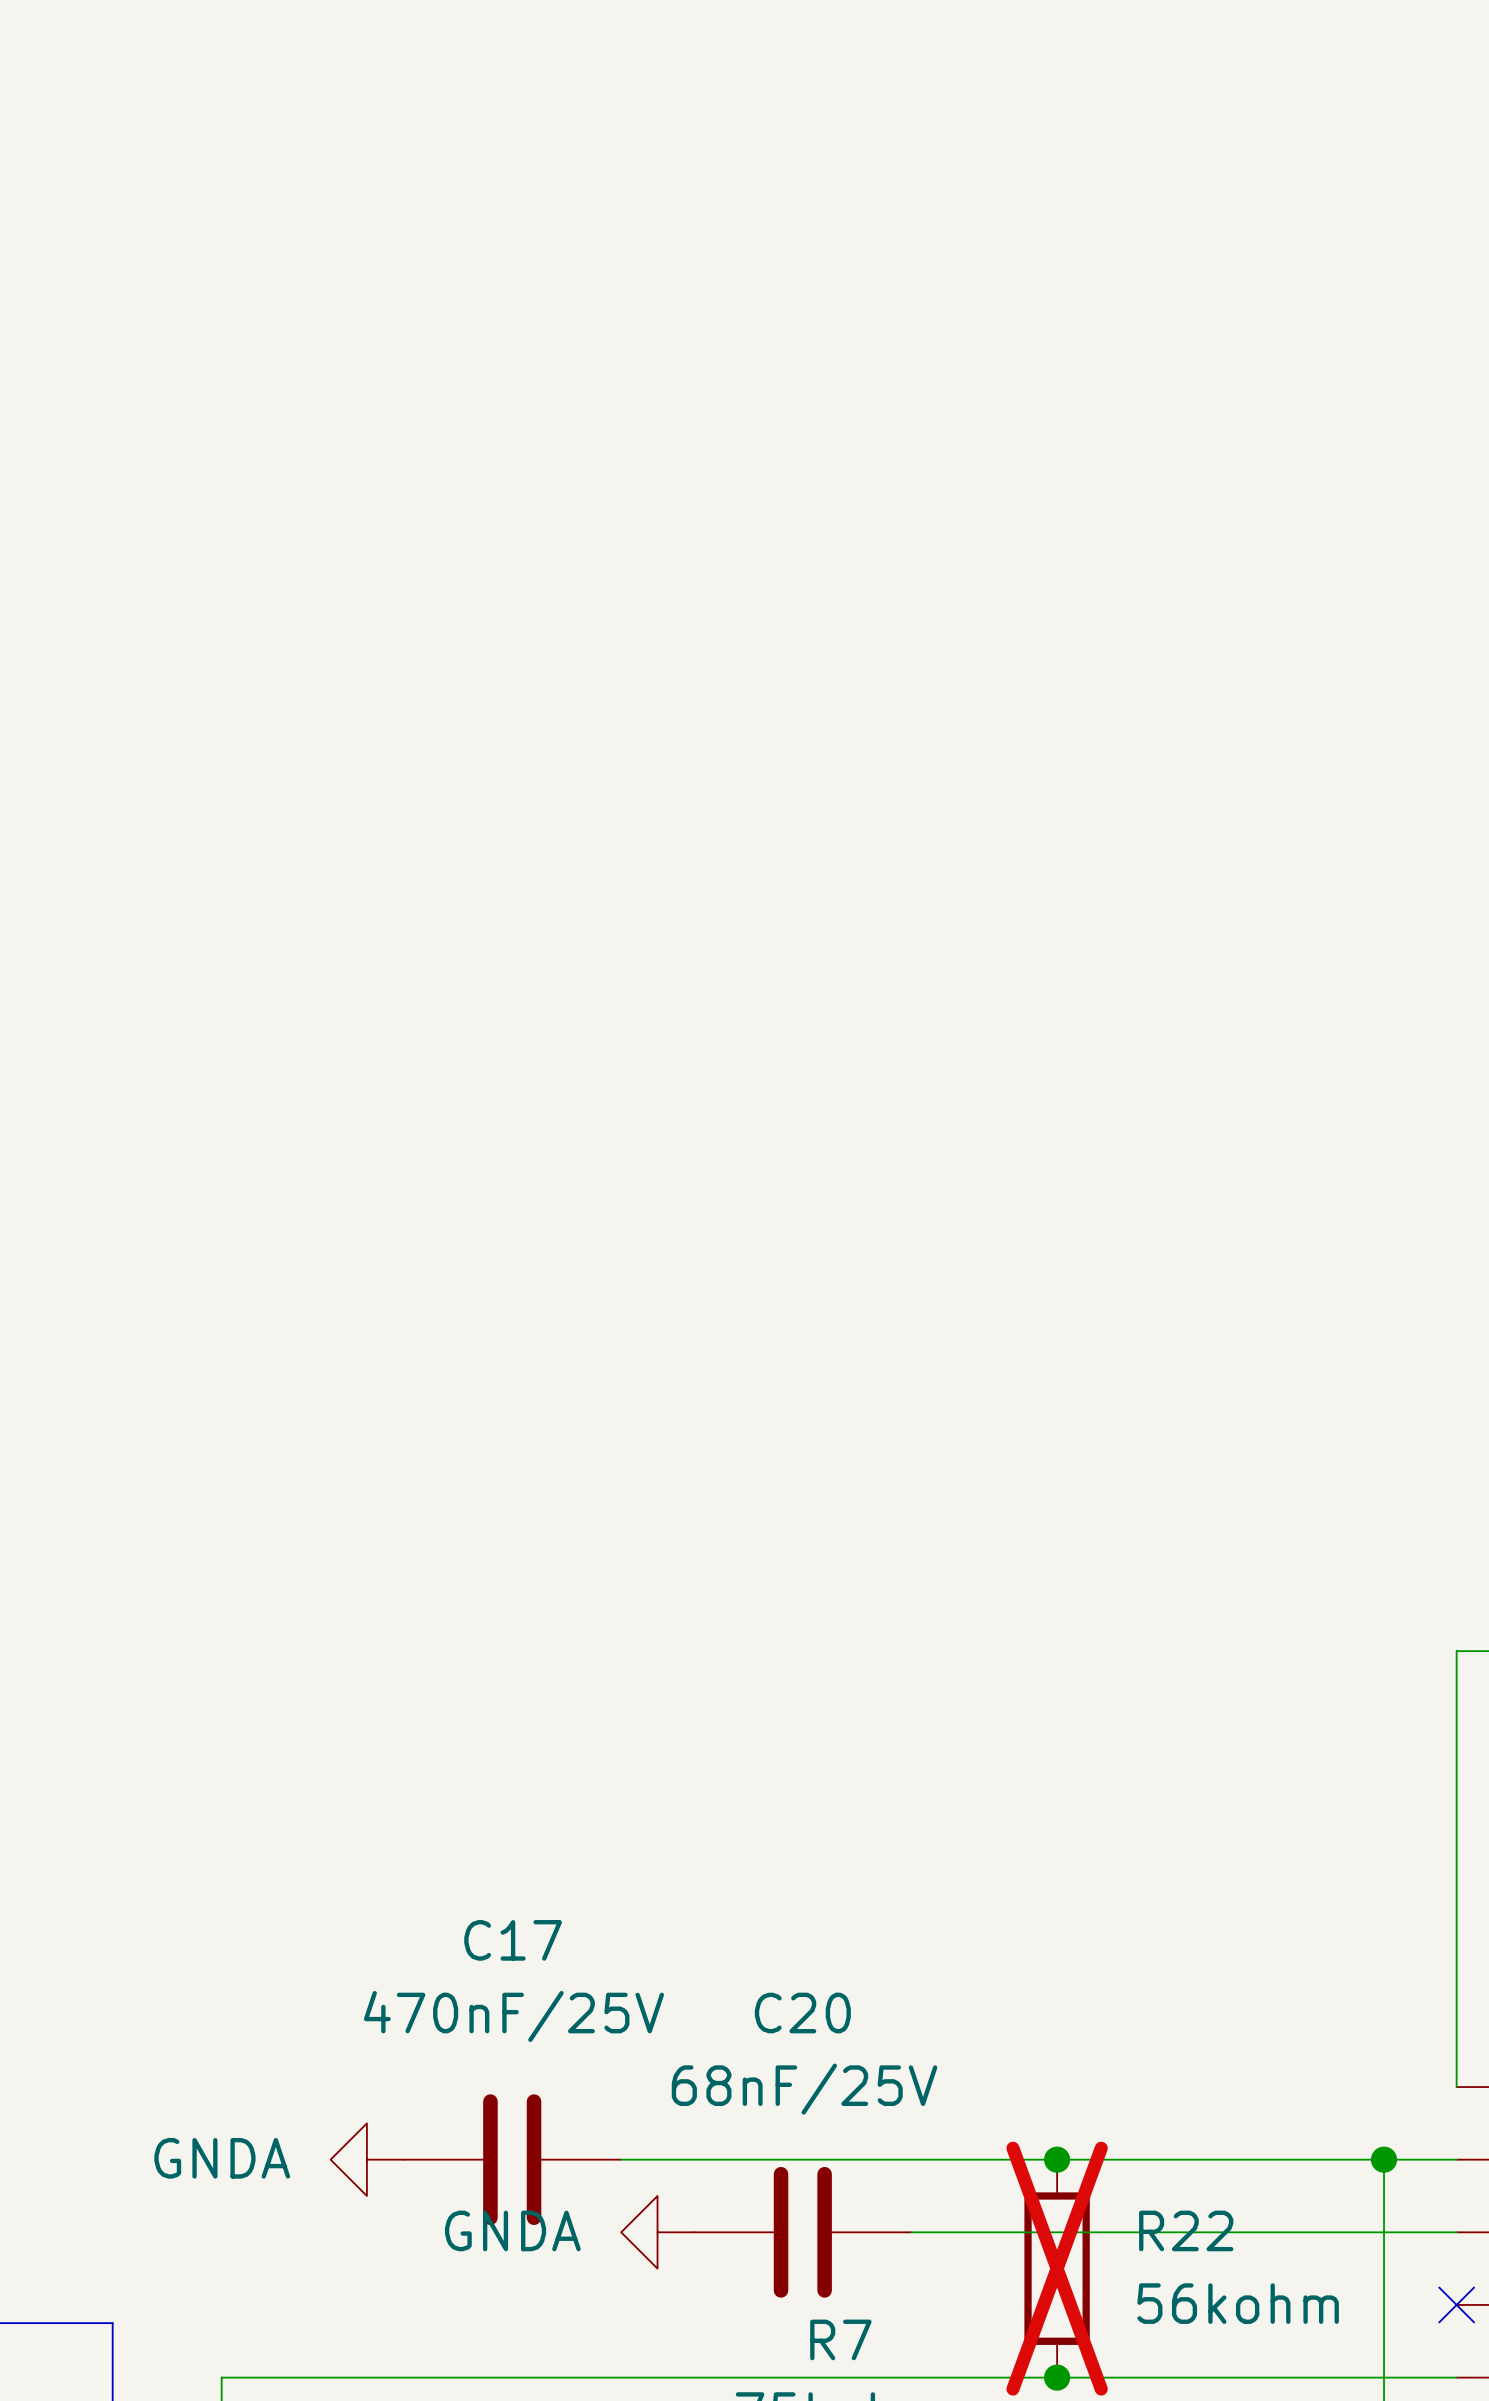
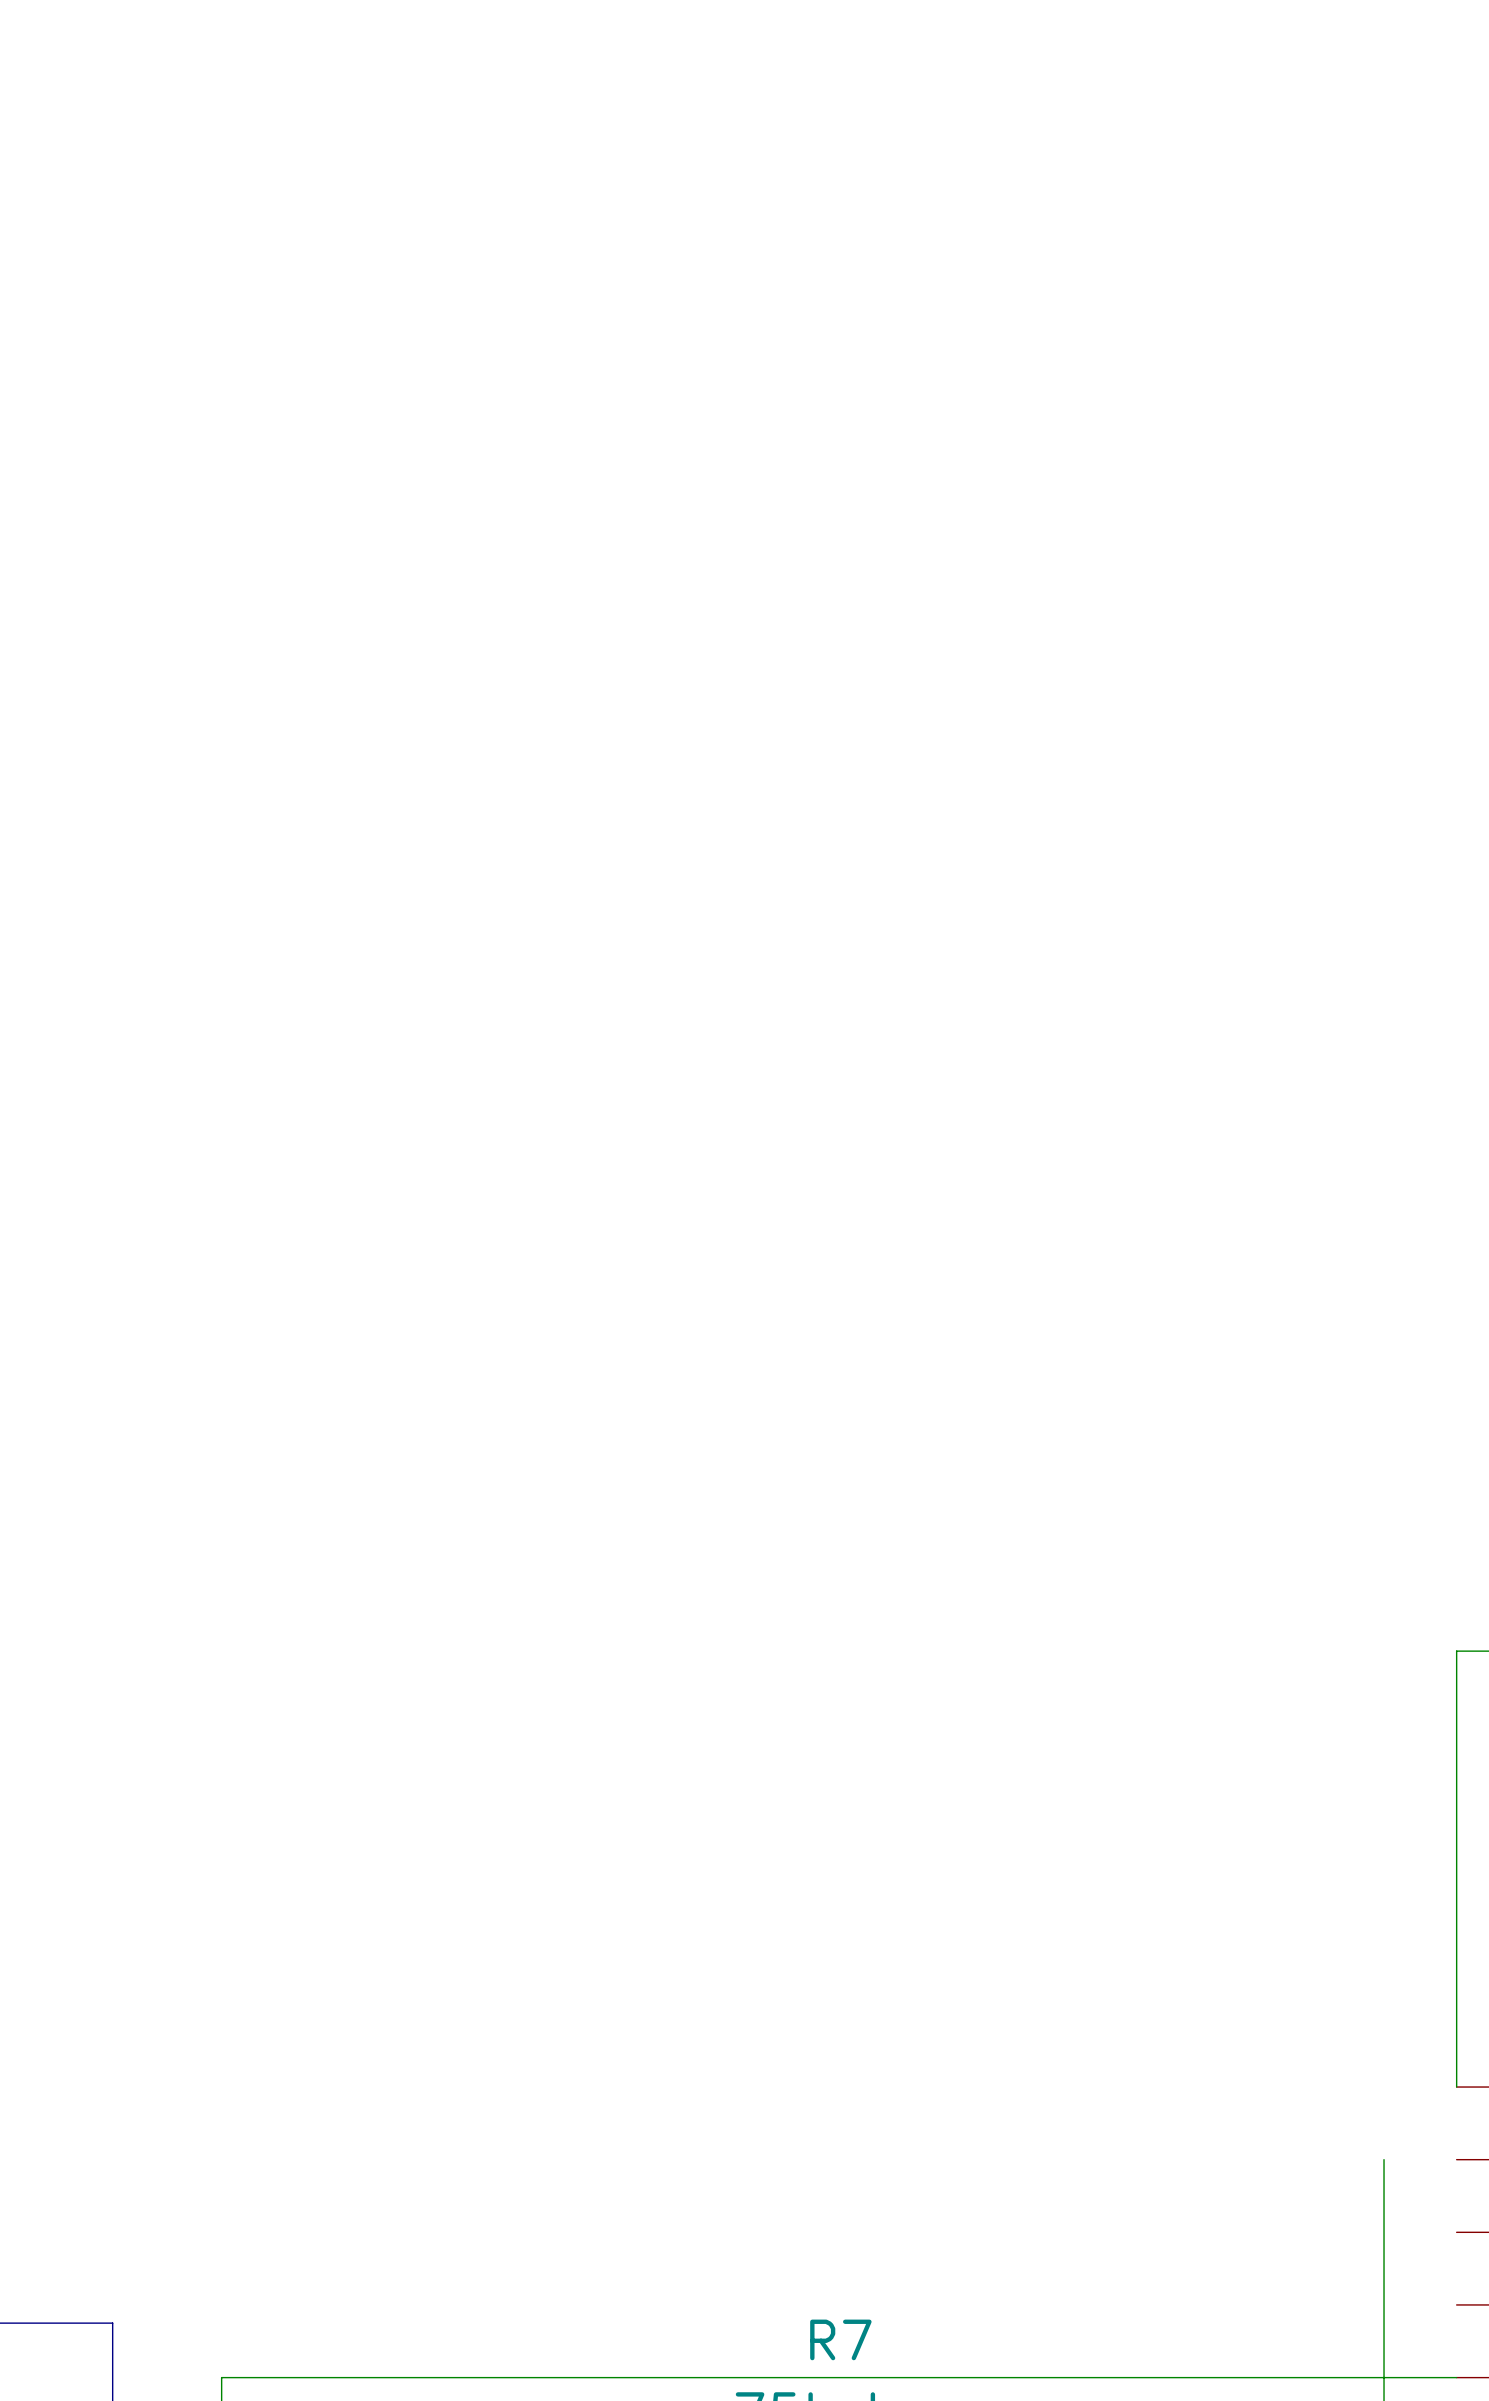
power symbol: GNDA (366, 2159) -> none
C17: 470nF/25V (512, 2159) -> none
wire: (621, 2159) (1456, 2159) -> none
junction: (1057, 2159) -> none
junction: (1384, 2159) -> none
power symbol: GNDA (657, 2232) -> none
C20: 68nF/25V (802, 2232) -> none
wire: (911, 2232) (1456, 2232) -> none
R22: 56kohm (1057, 2268) -> none
no-connect mark: (1456, 2304) -> none
junction: (1057, 2377) -> none

